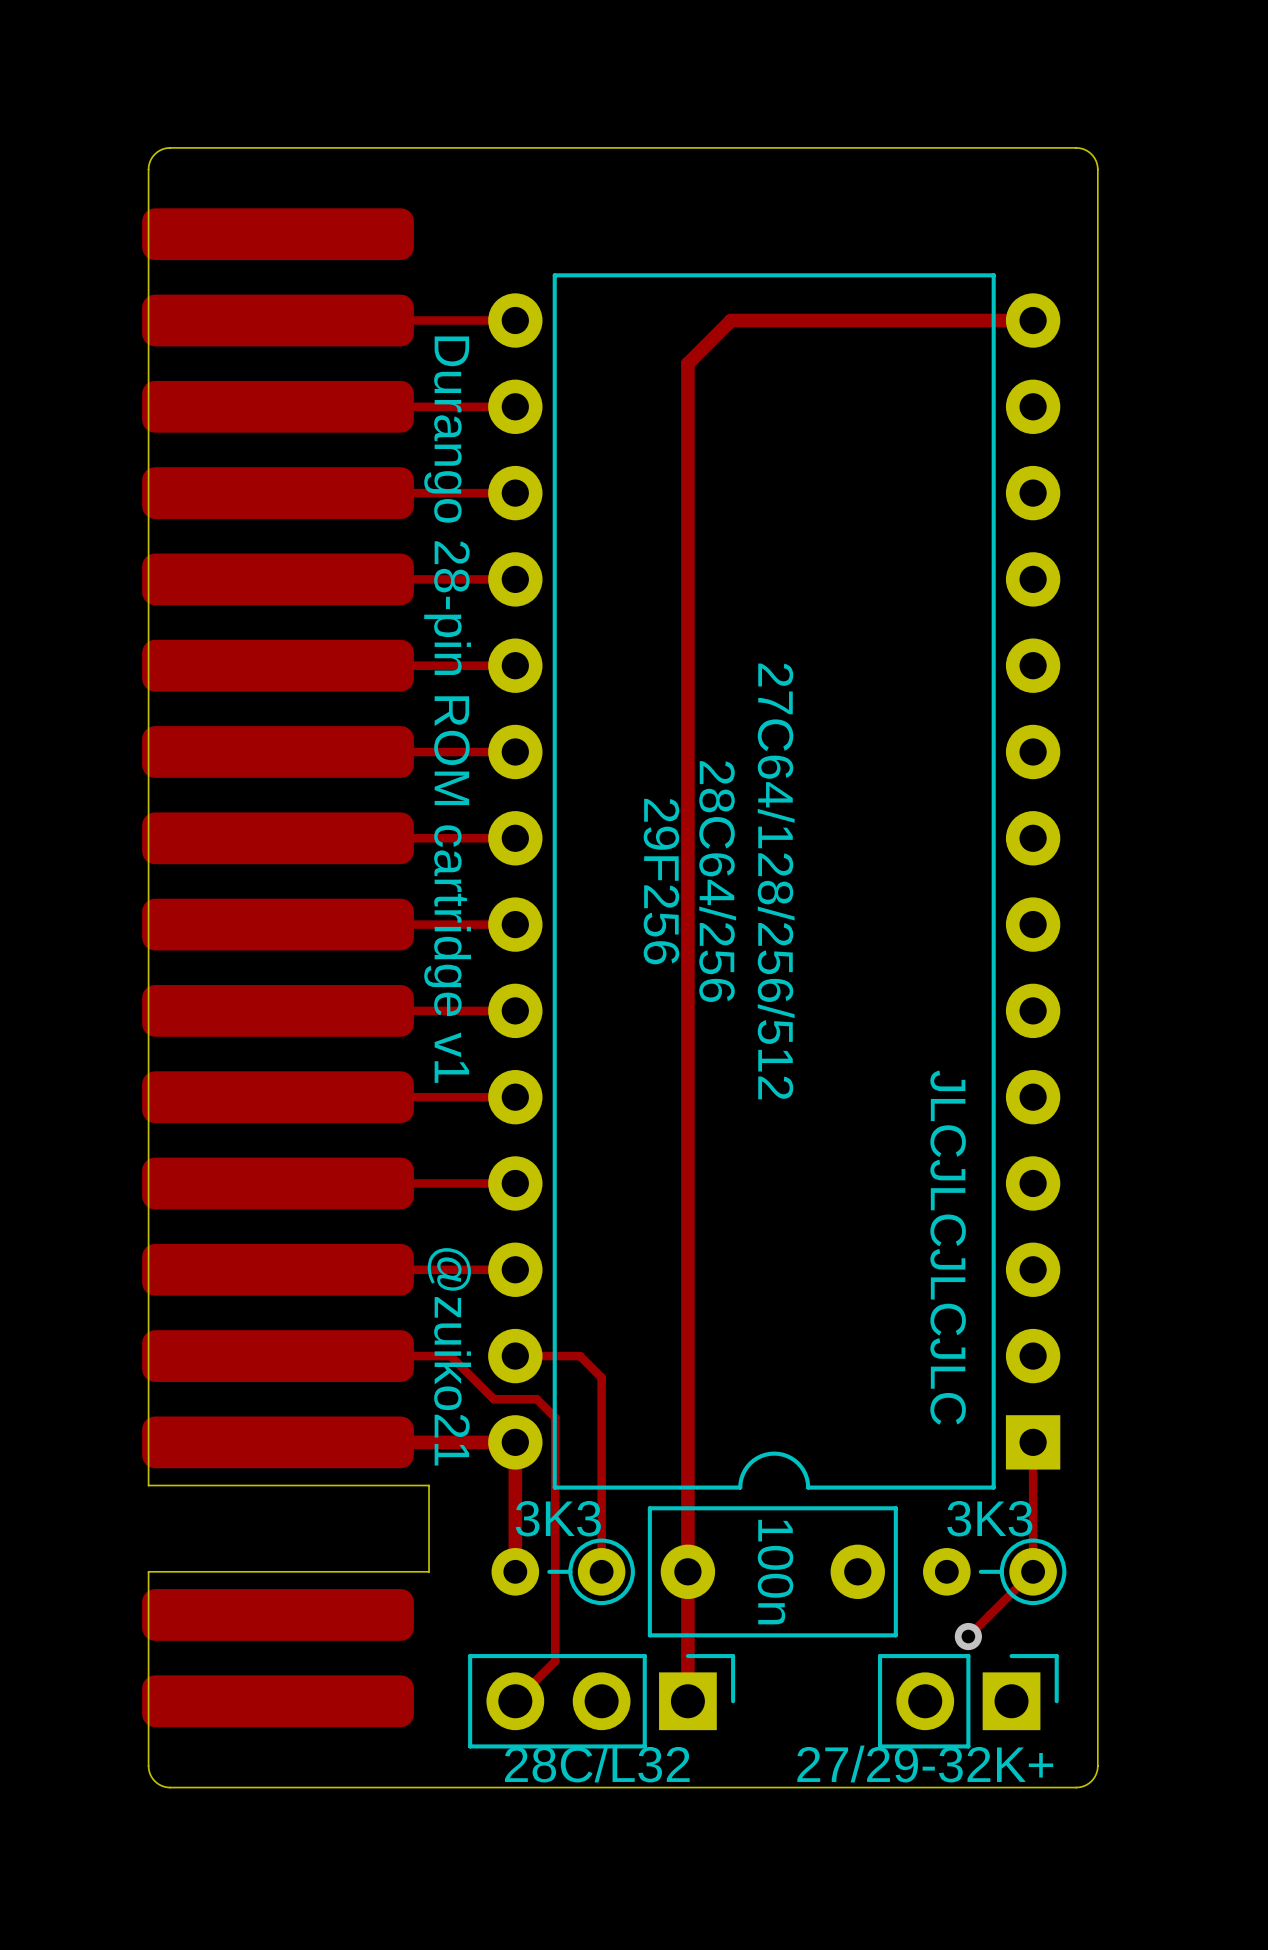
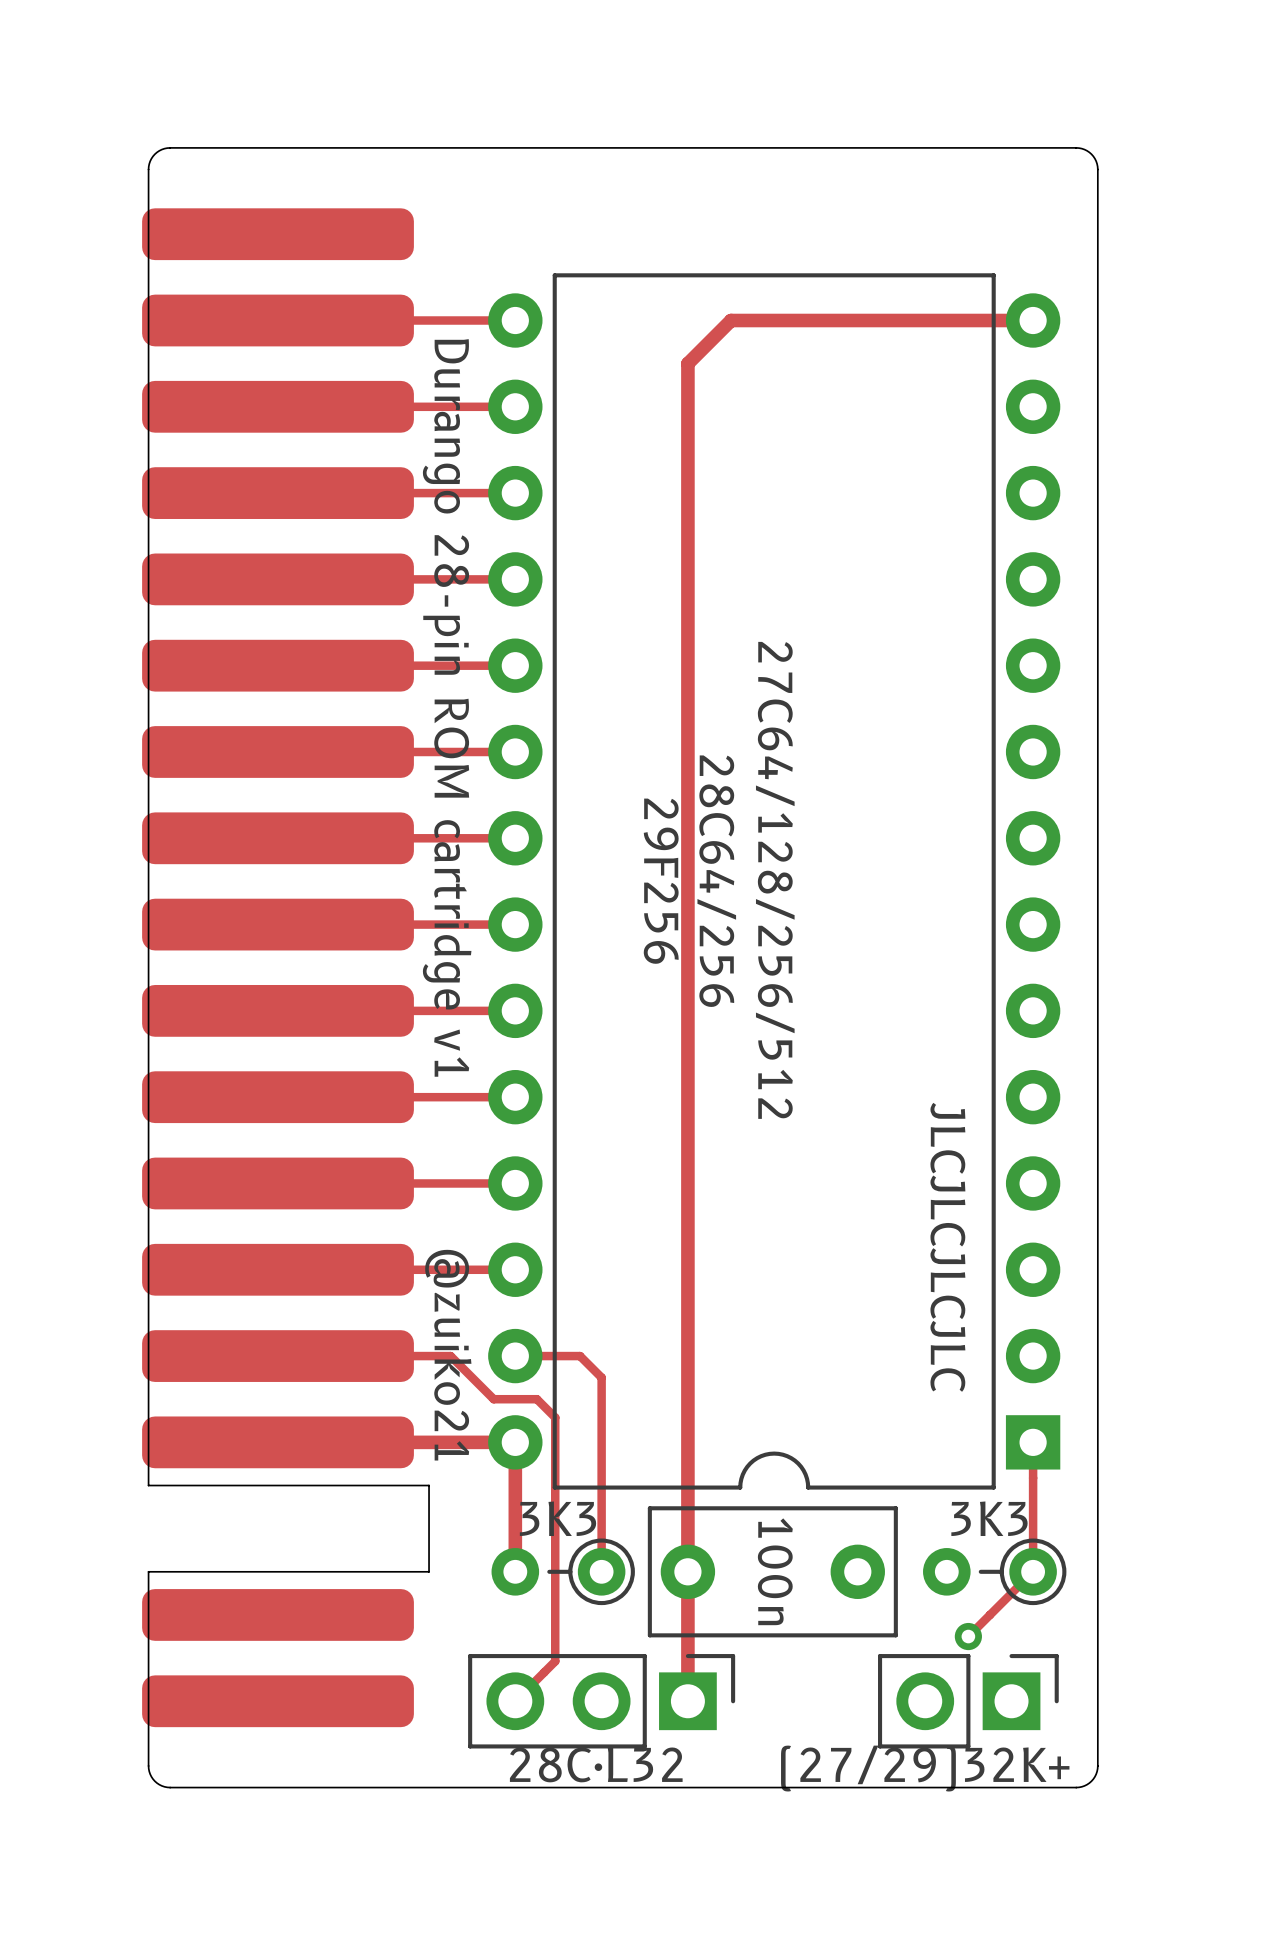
part value: 28C/L32 (597, 1764) -> 28C·L32 (596, 1764)
part value: 27/29-32K+ (925, 1764) -> (27/29)32K+ (925, 1768)

